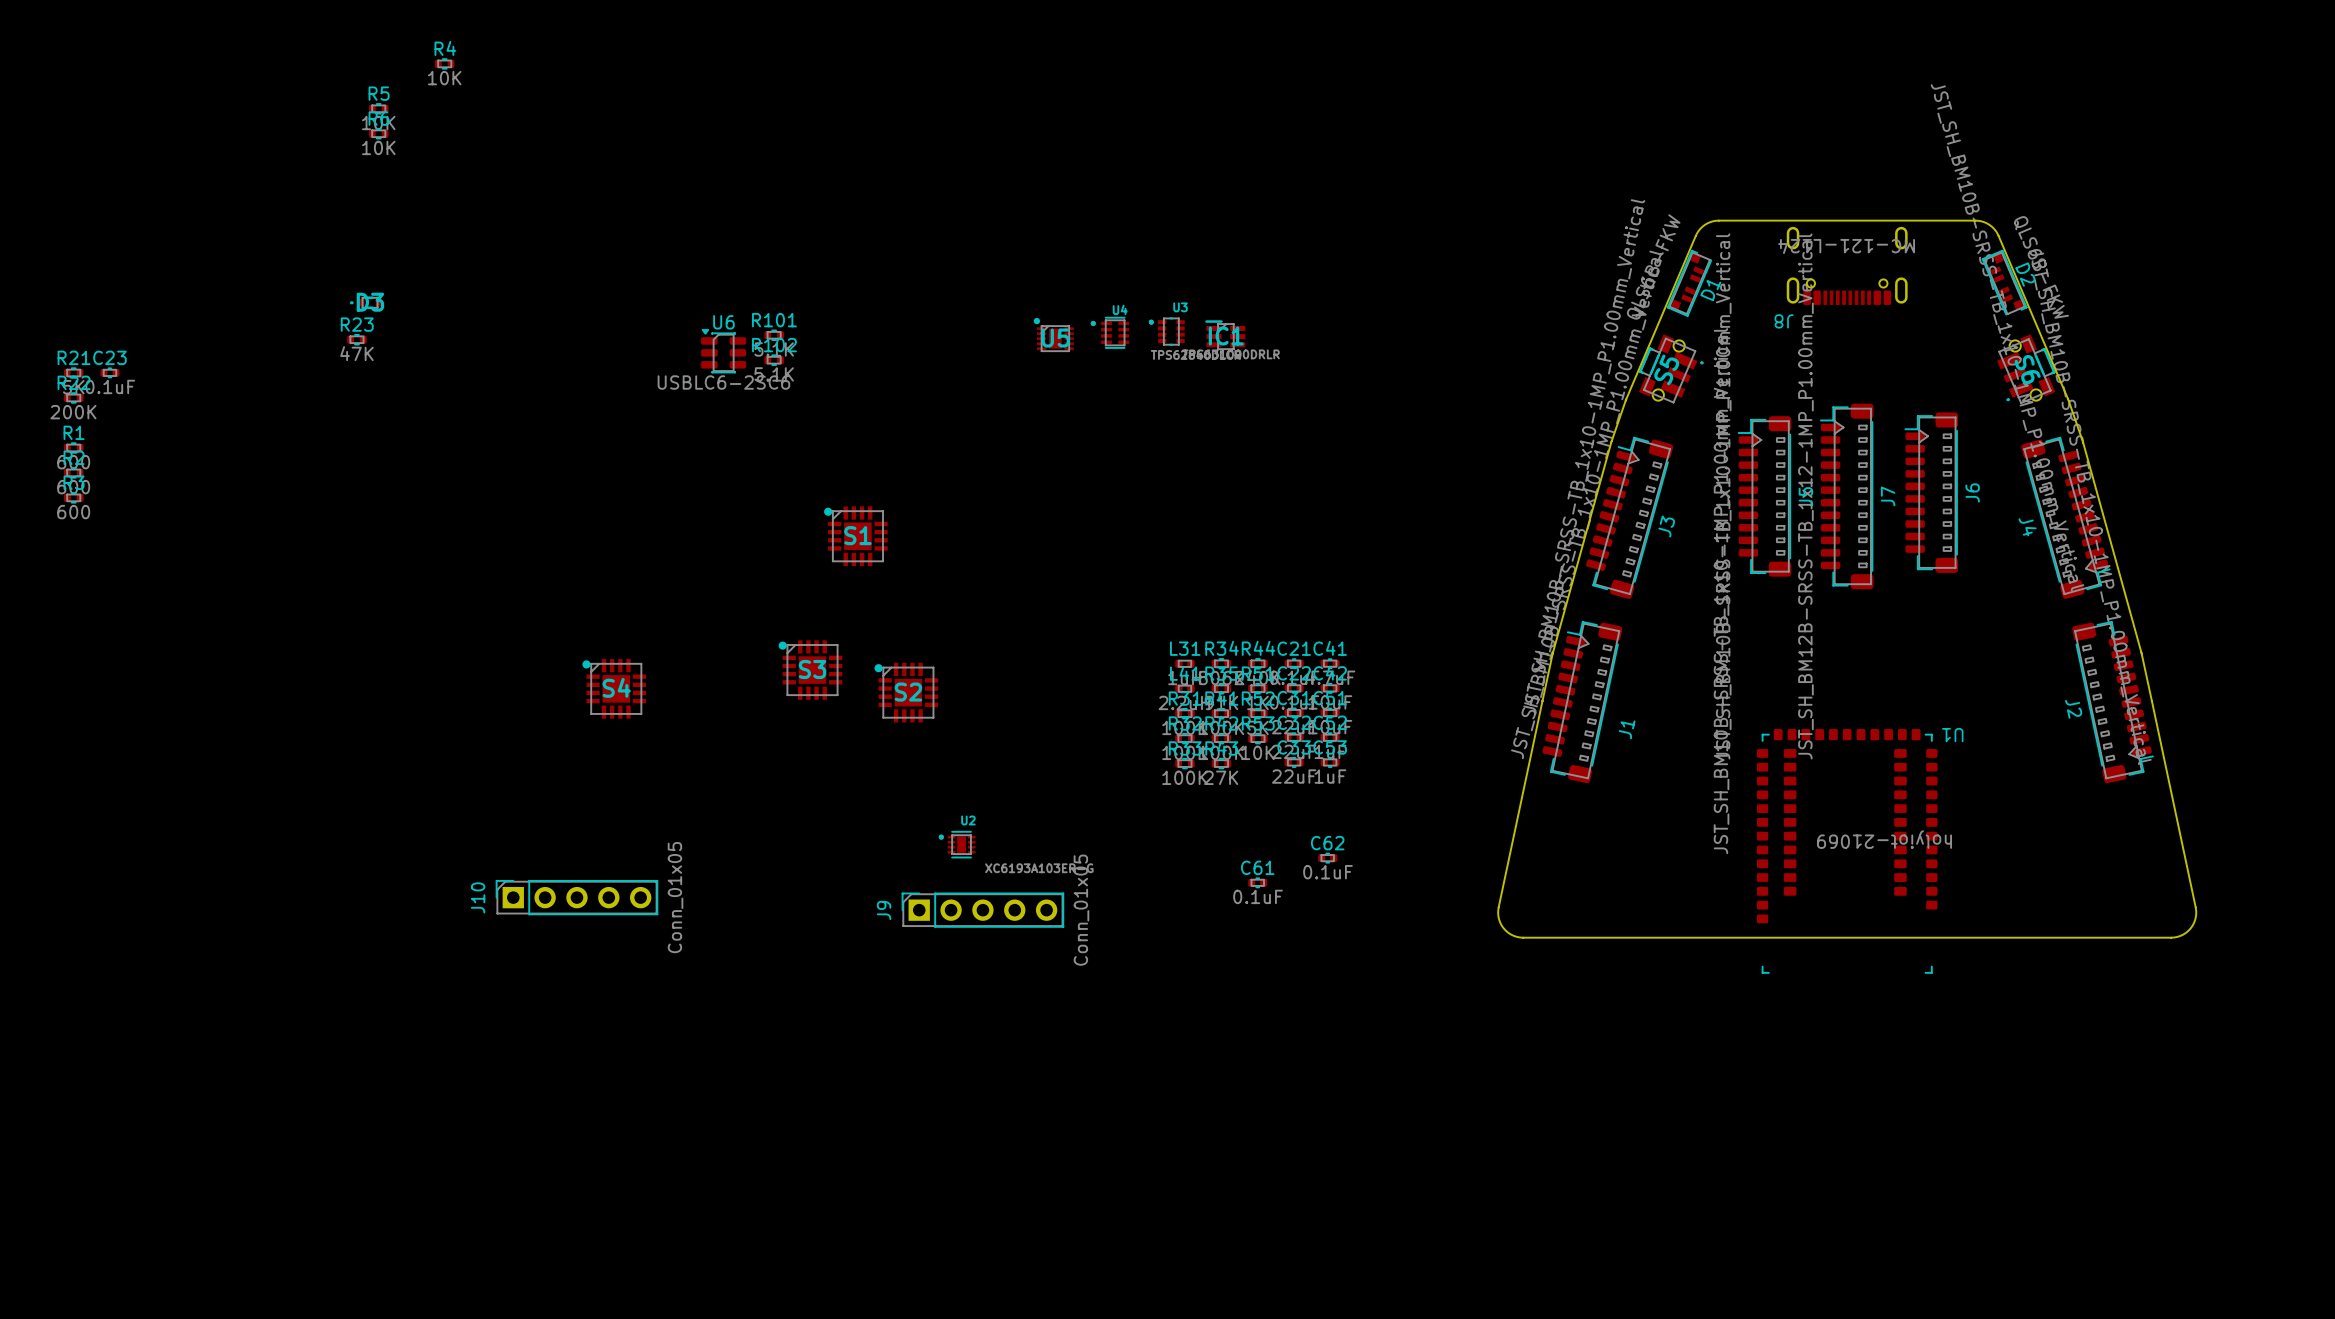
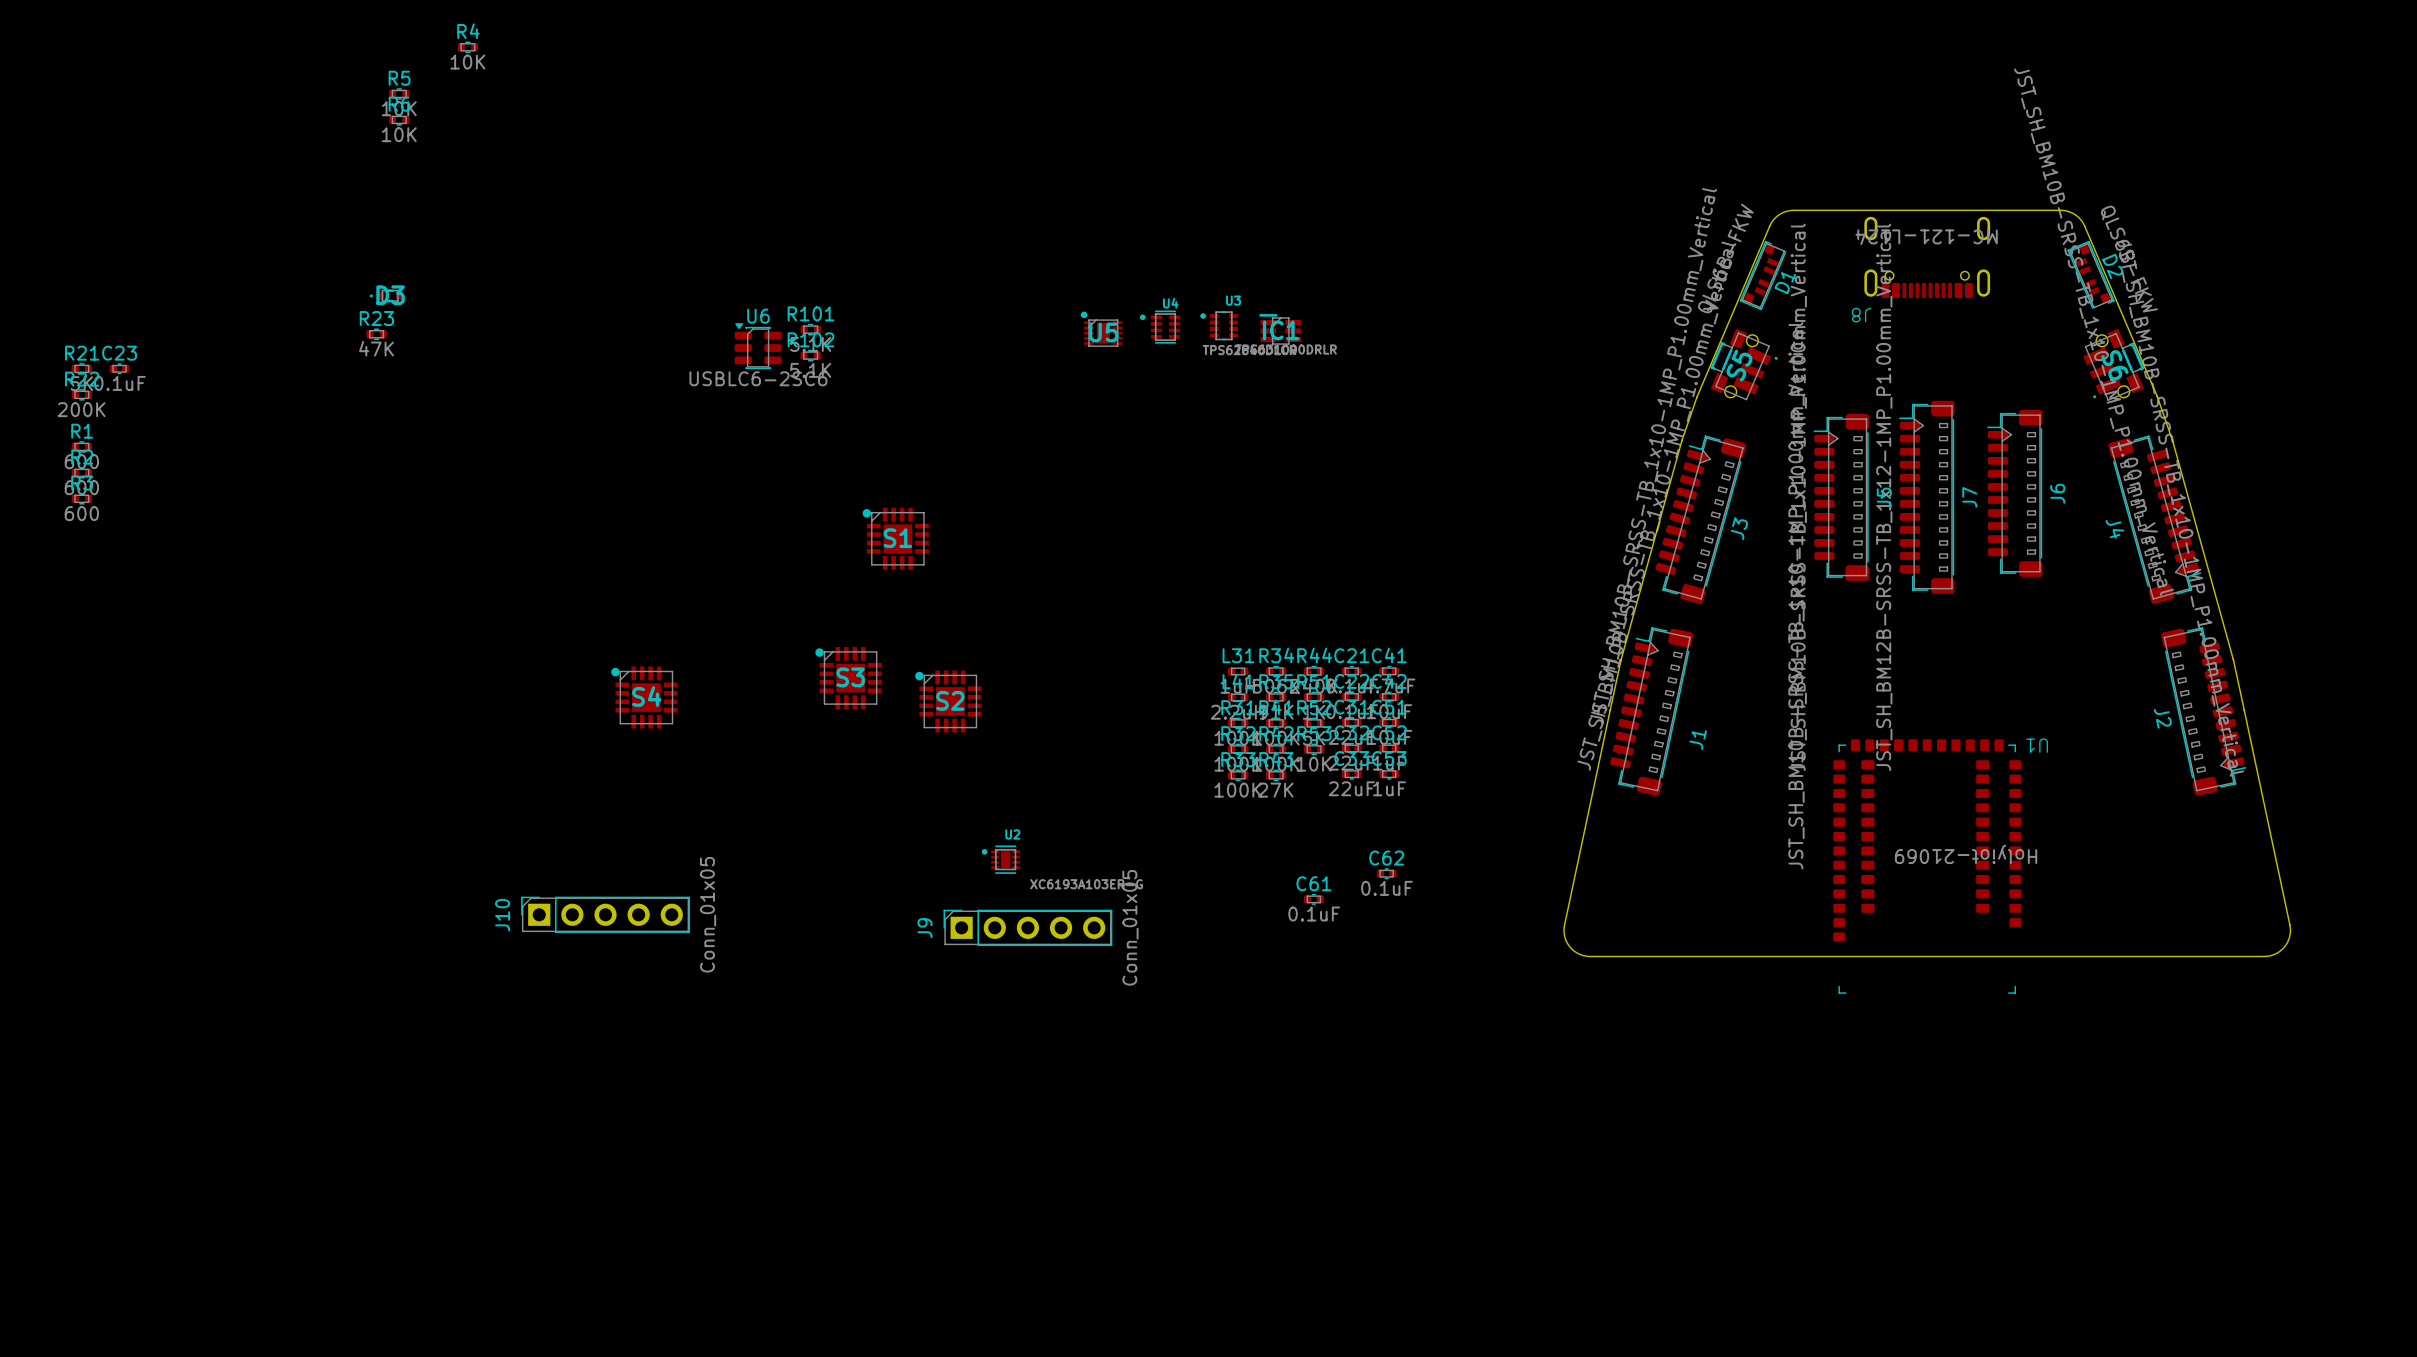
U1 value: holyiot-21069 (1884, 839) -> Holyiot-21069 (1966, 854)

